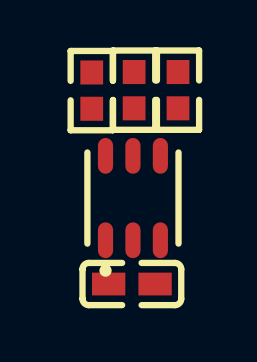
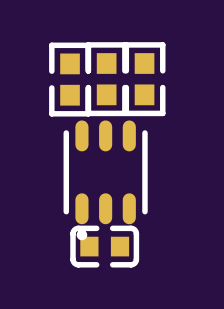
part footprint: [79, 259, 185, 309] -> [70, 225, 140, 268]

